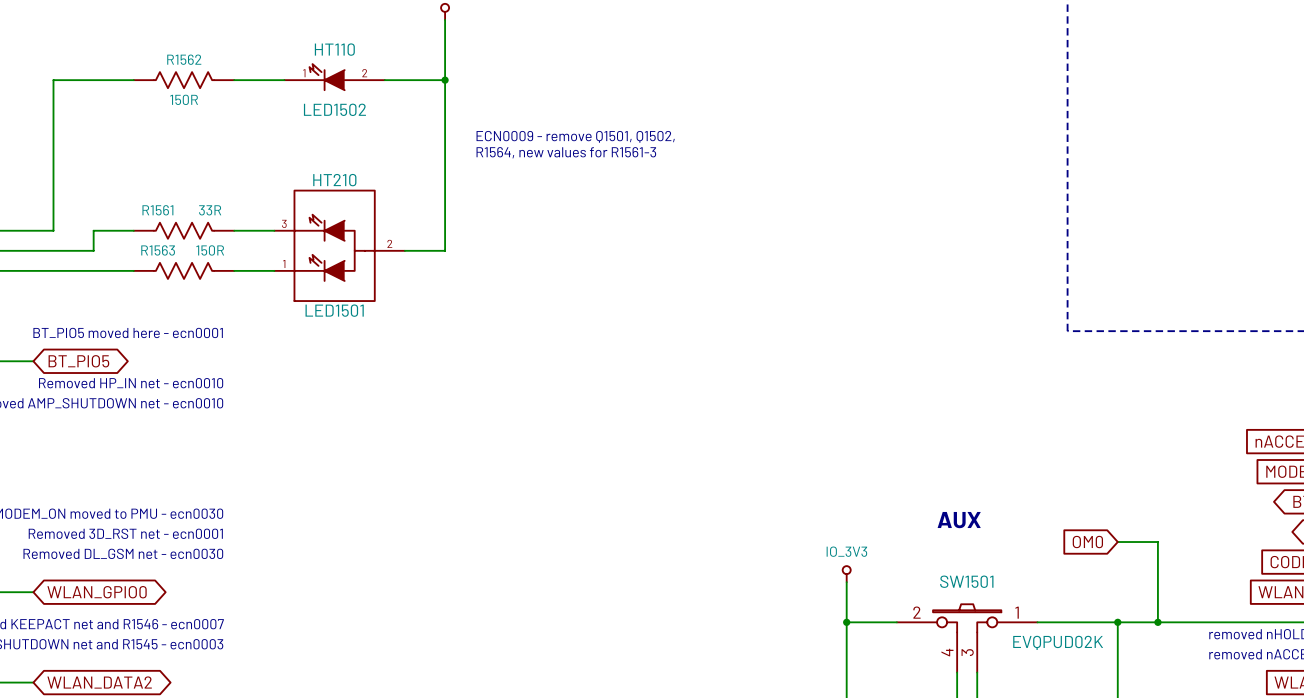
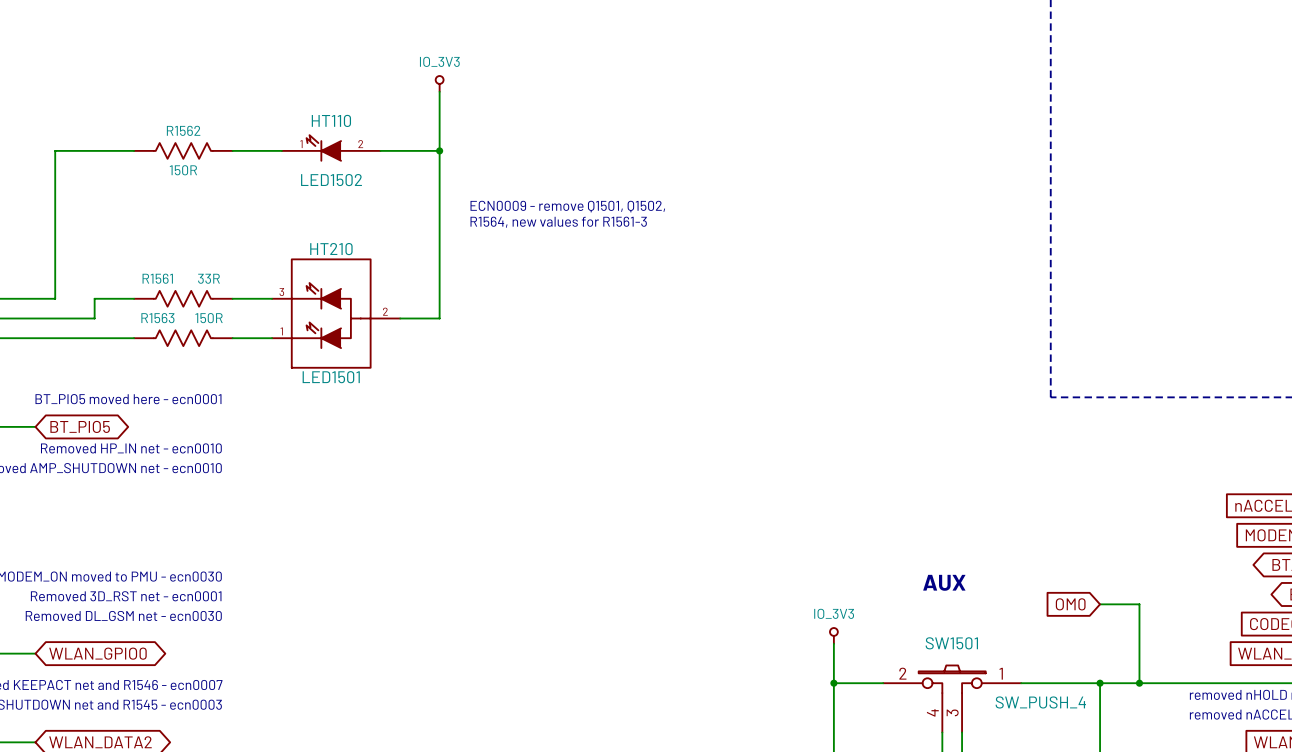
SW1501 value: EVQPUD02K (1058, 642) -> SW_PUSH_4 (1040, 702)

